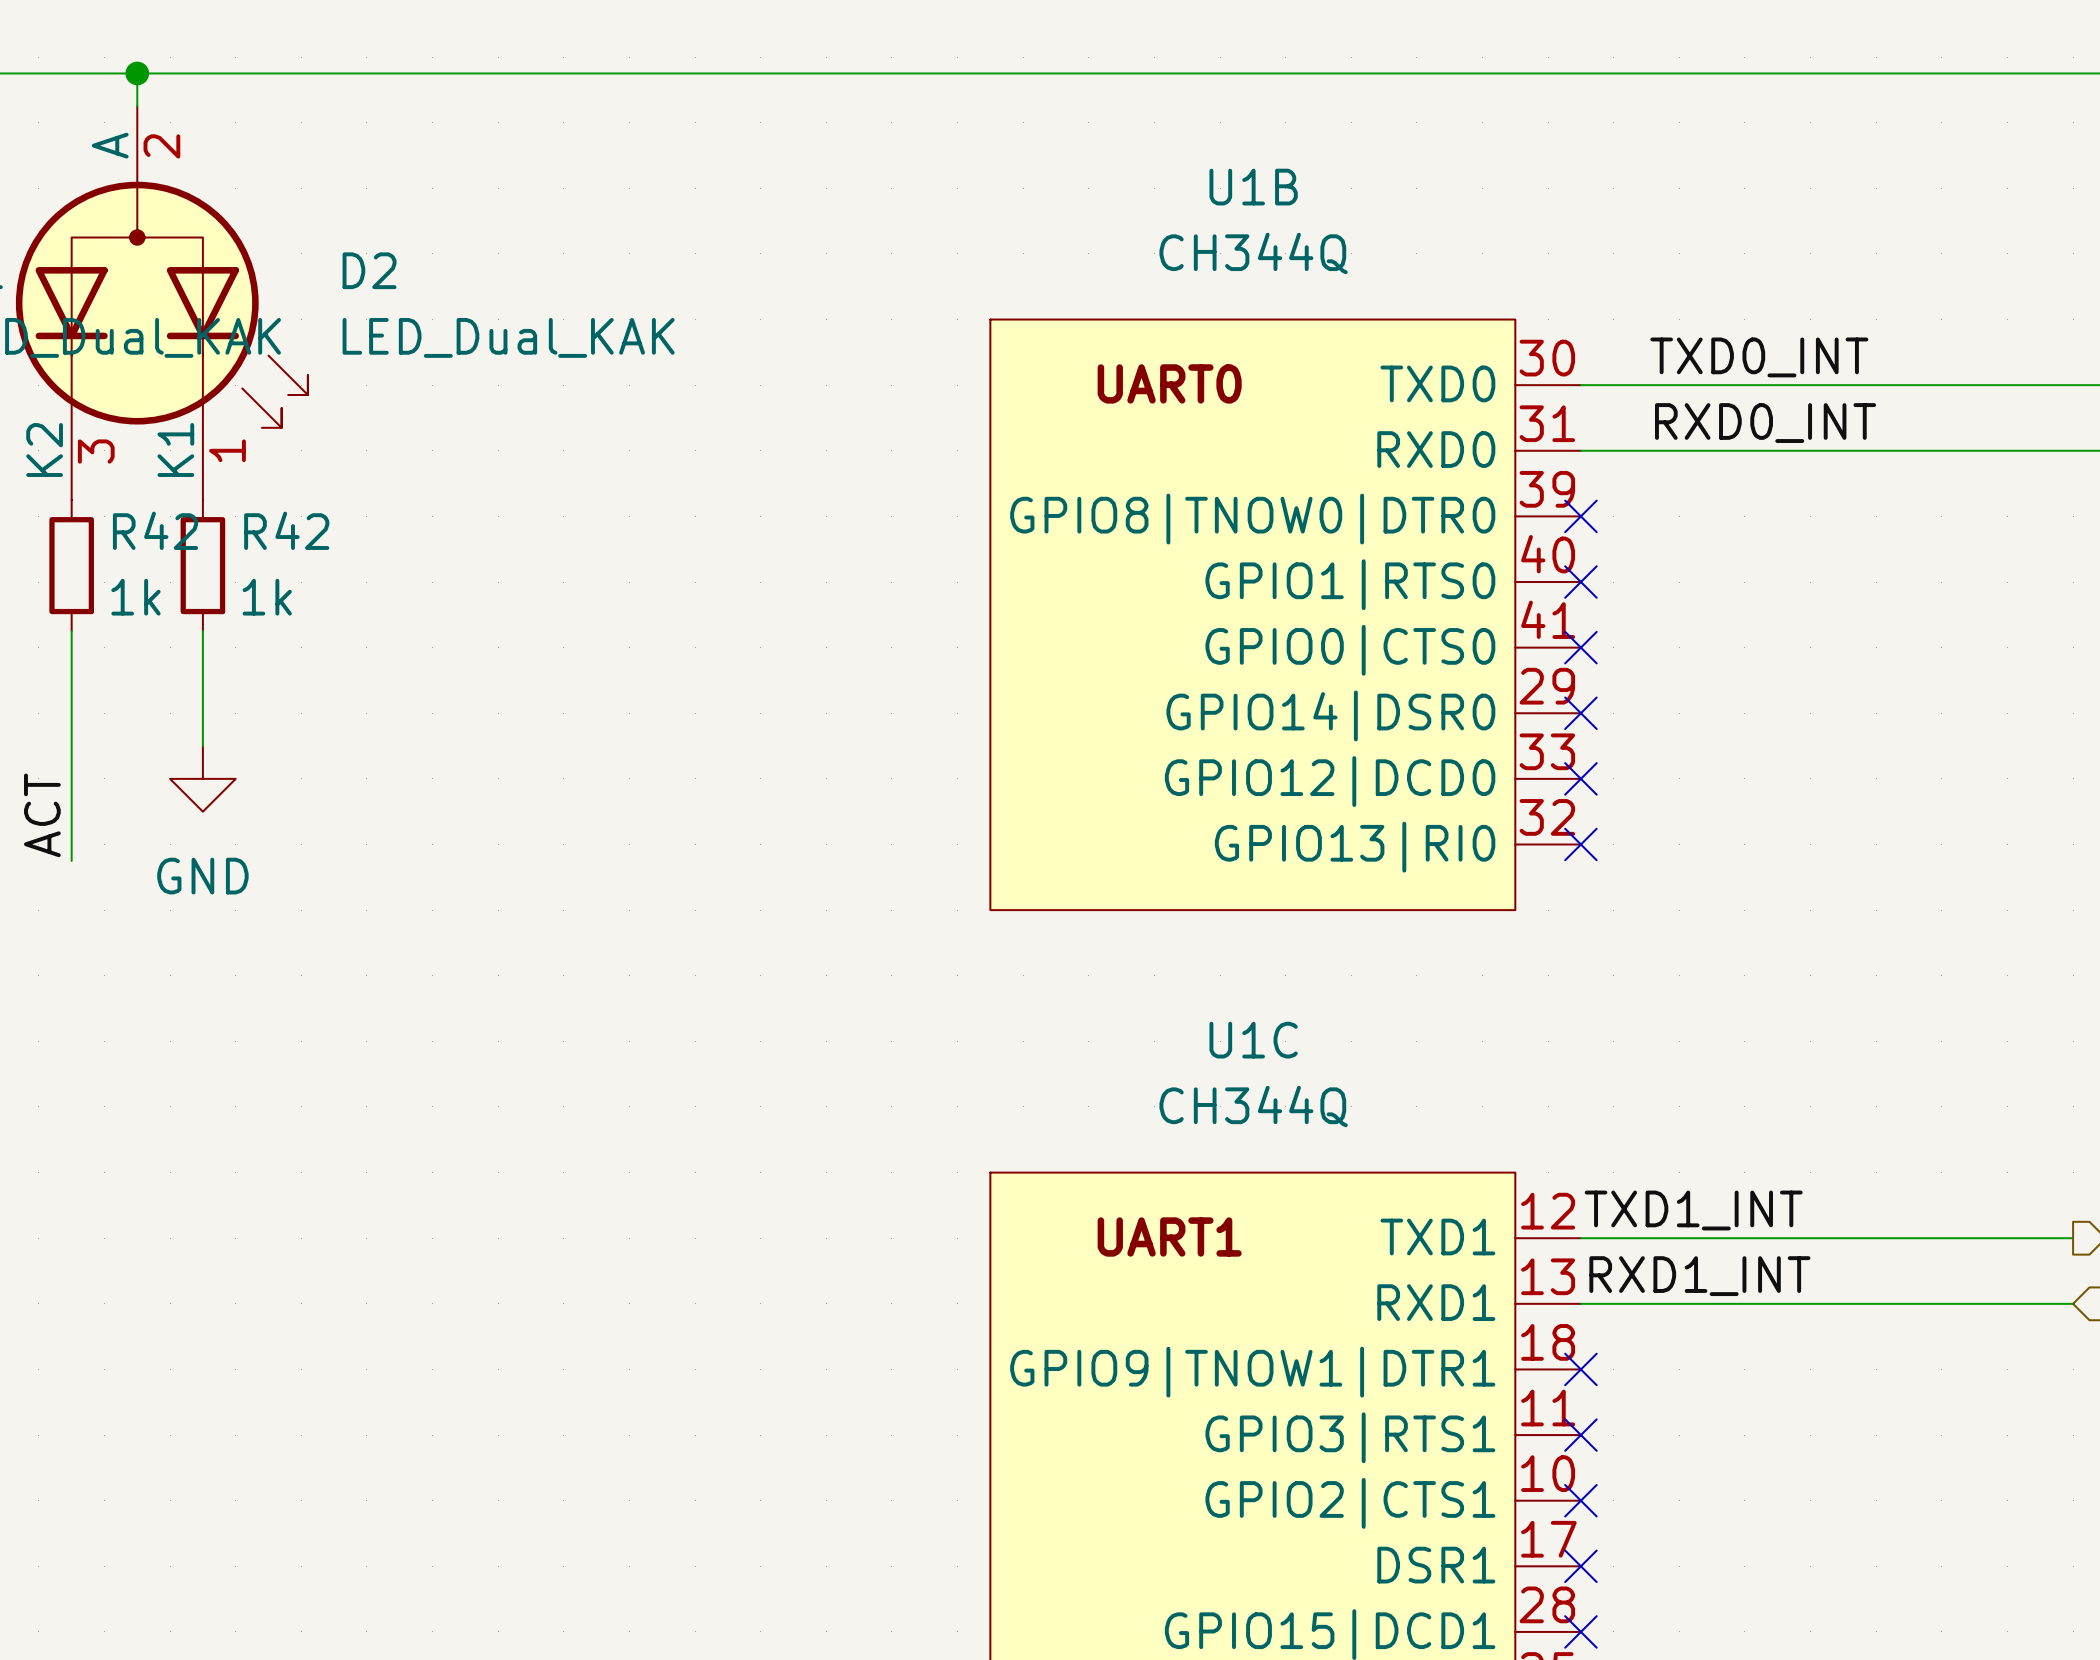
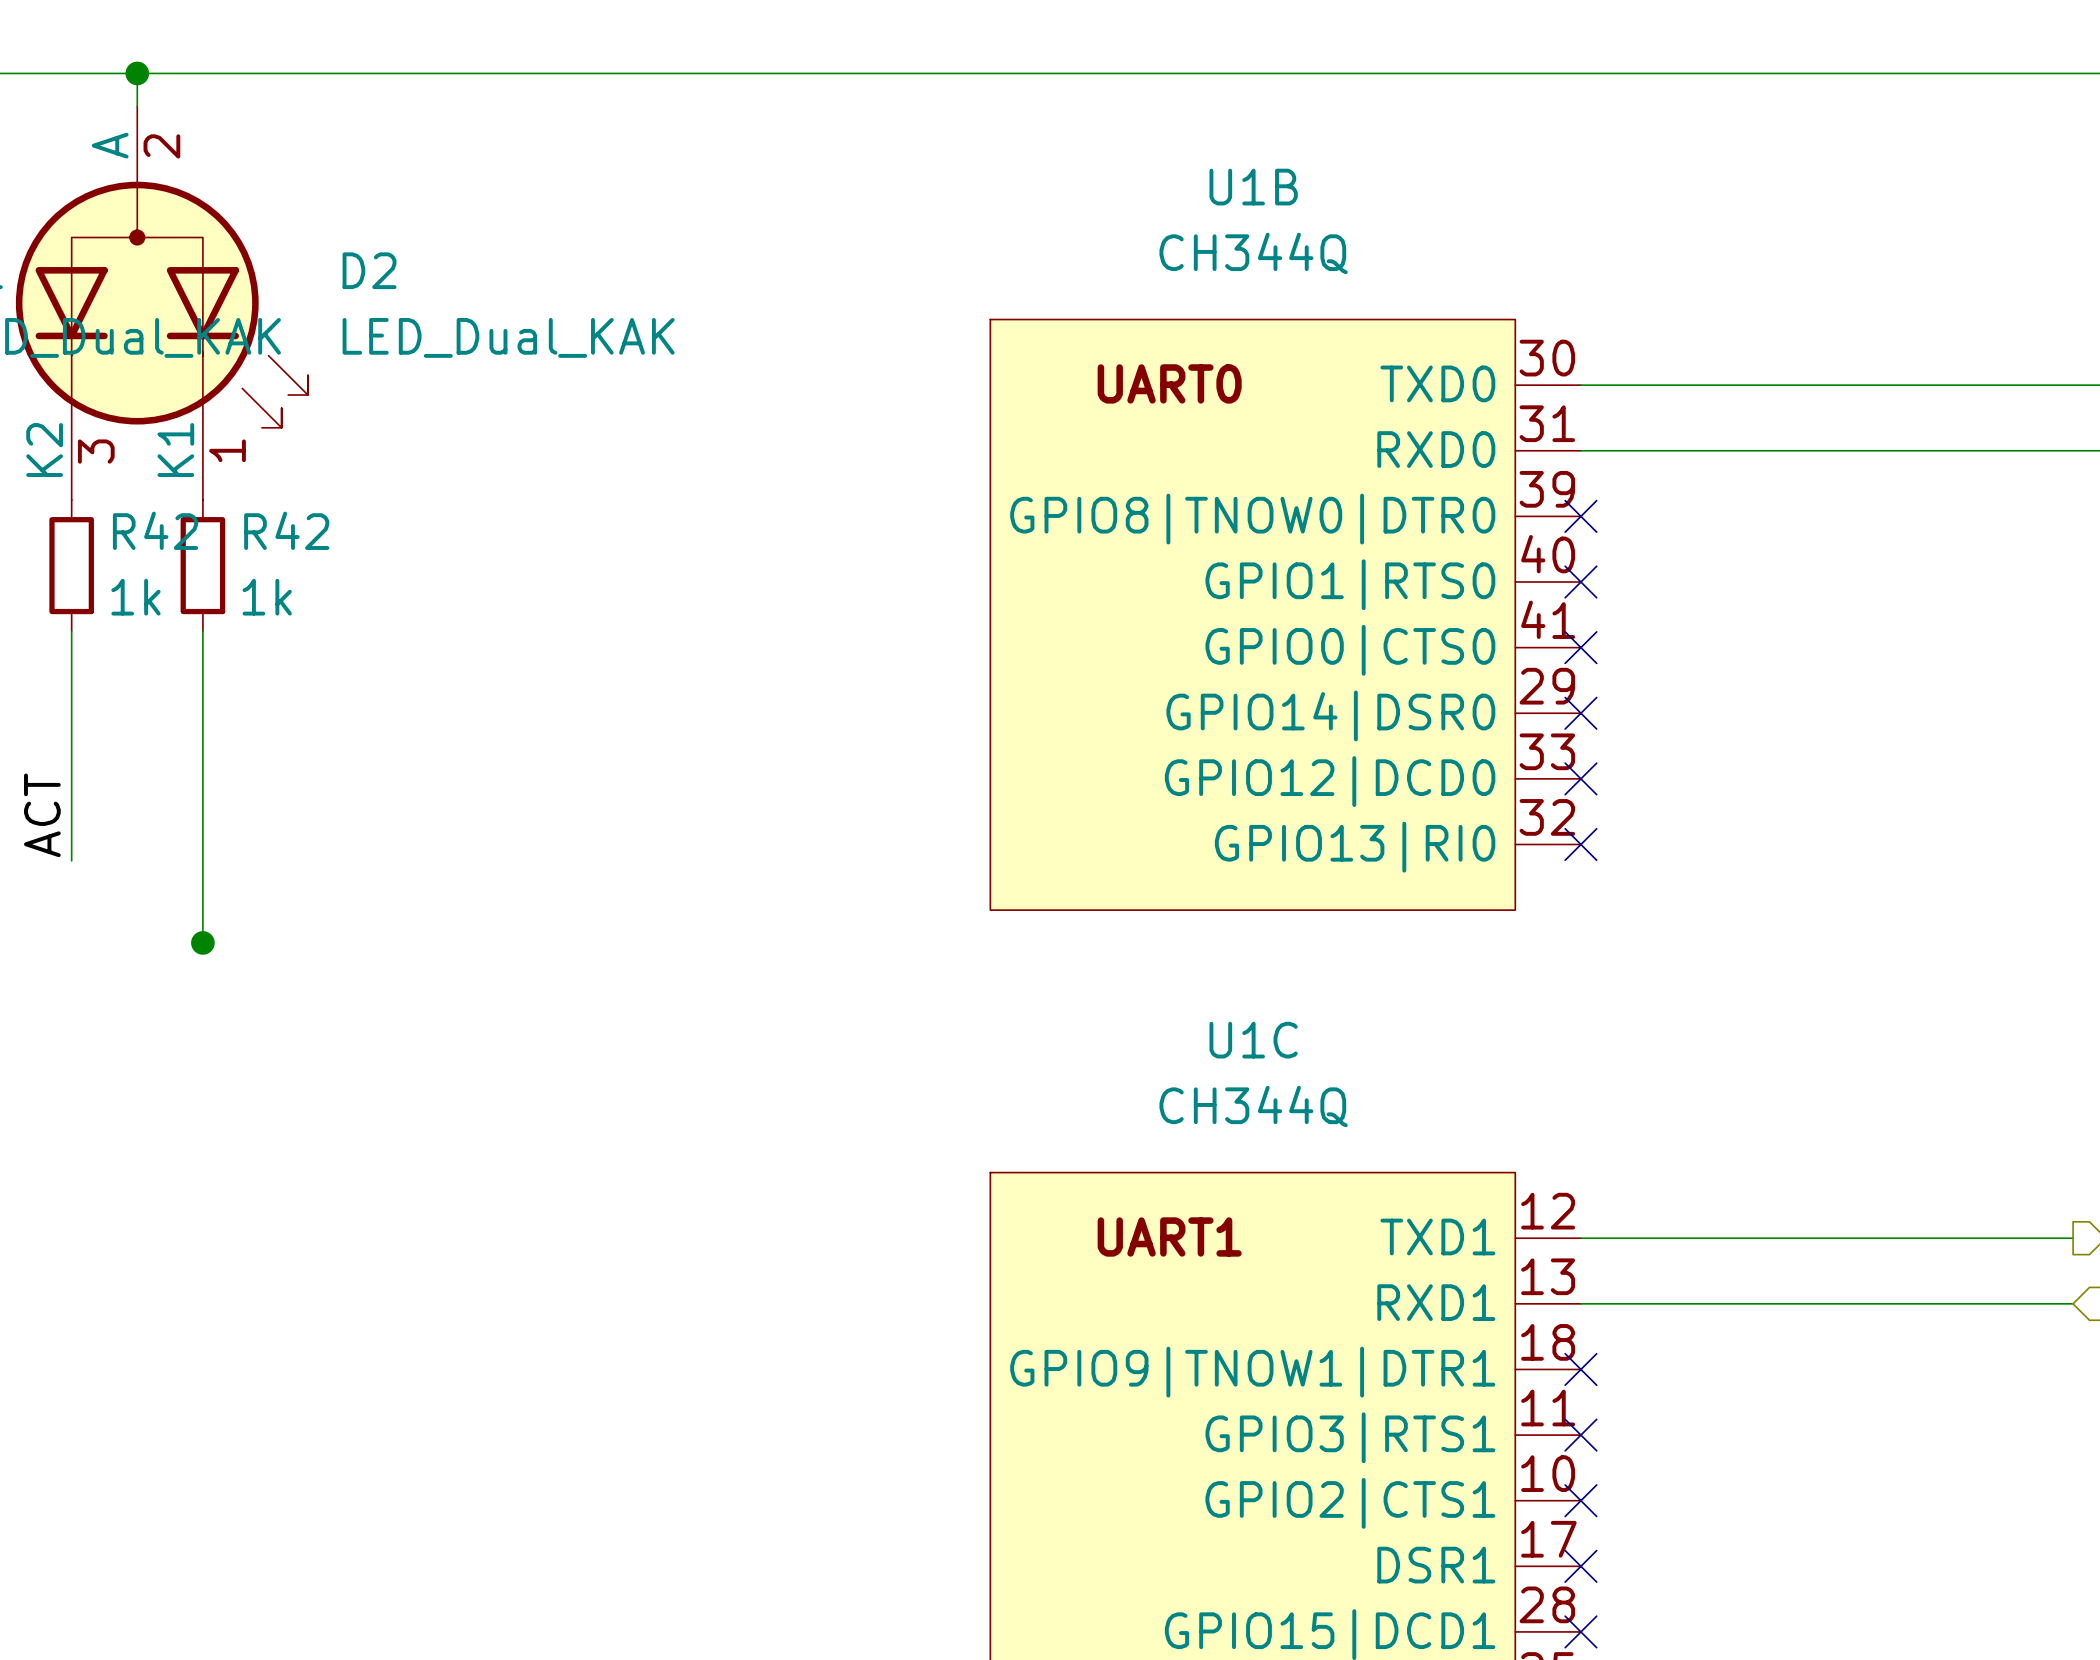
label: TXD0_INT (1759, 357) -> none
label: RXD0_INT (1765, 423) -> none
wire: none -> (202, 746) (202, 942)
power symbol: GND (202, 778) -> none
junction: none -> (202, 942)
label: TXD1_INT (1693, 1210) -> none
label: RXD1_INT (1699, 1276) -> none

